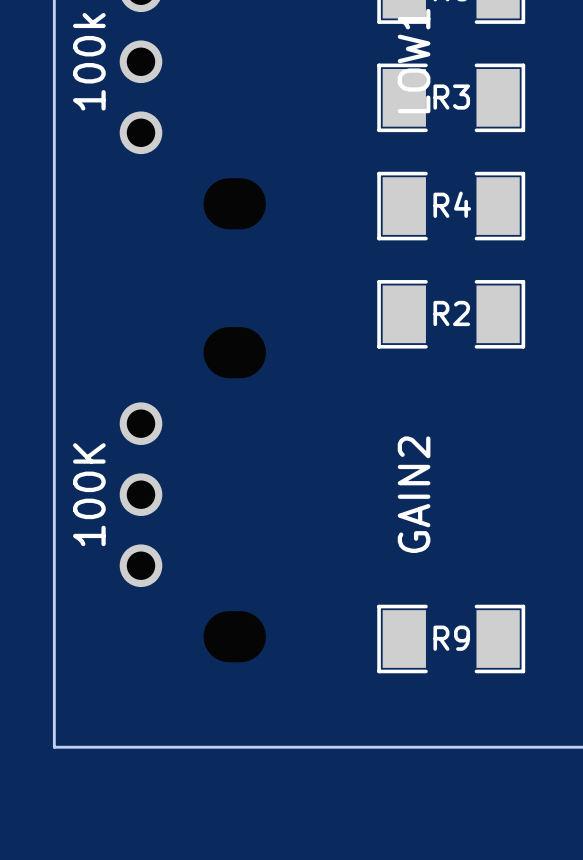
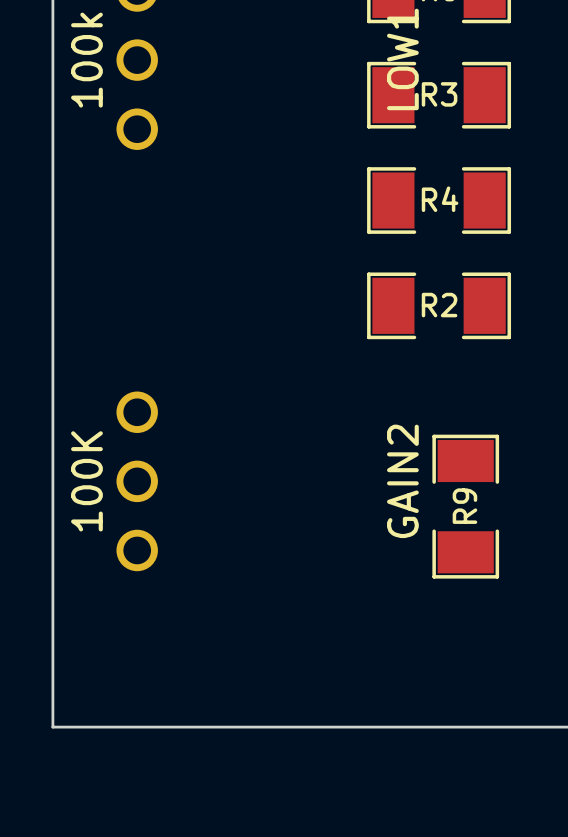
R9 rotation: 0° (451, 639) -> 90° clockwise (465, 506)
R9 position: (451, 639) -> (465, 506)

